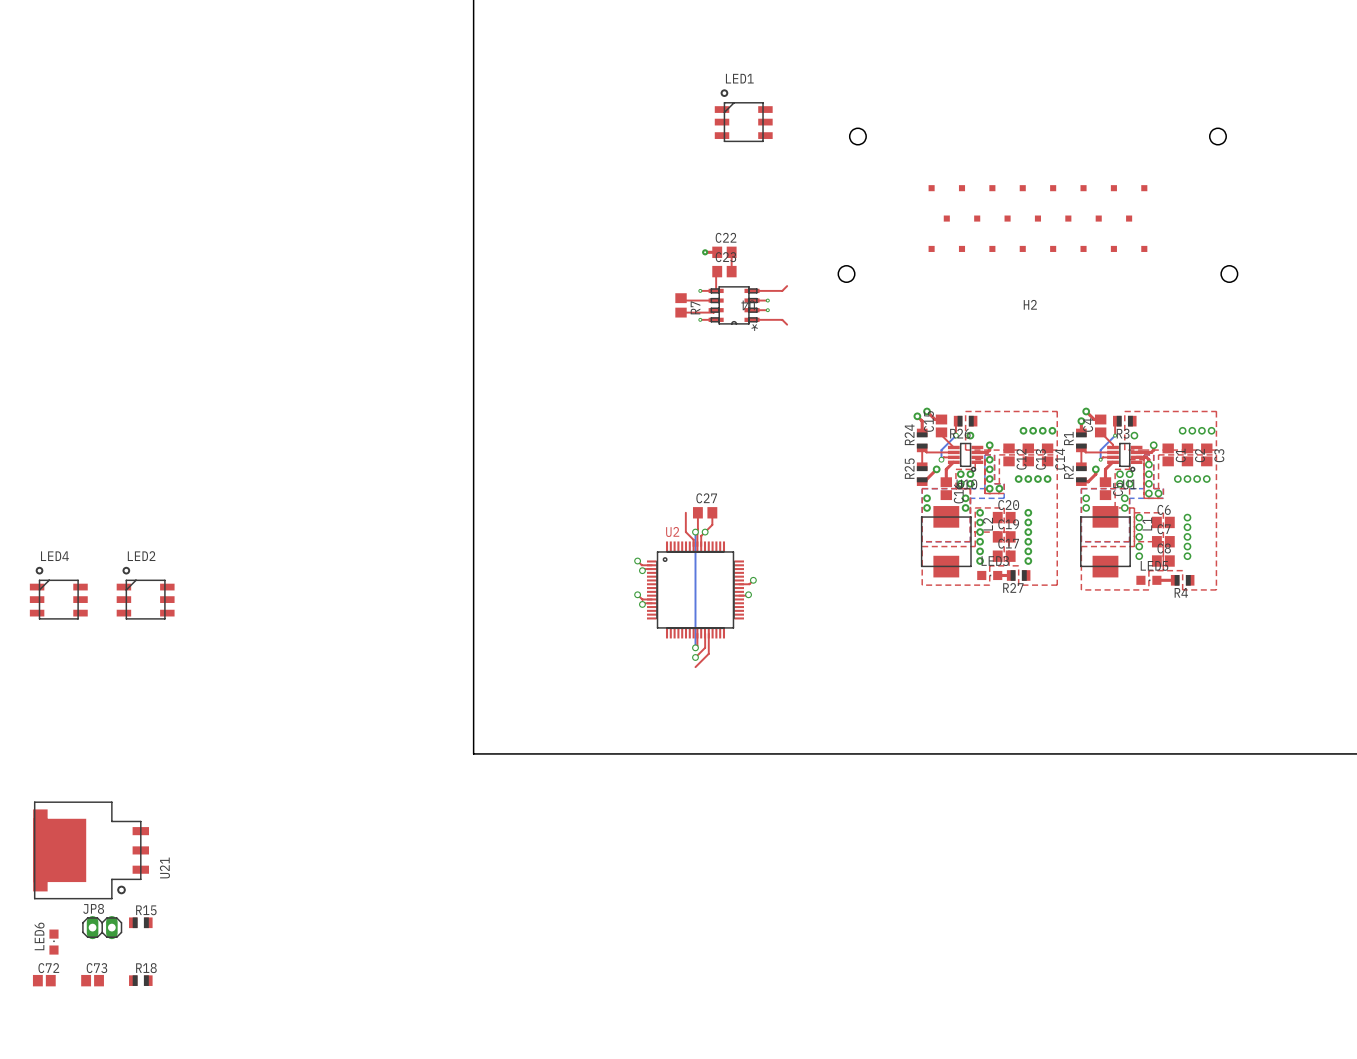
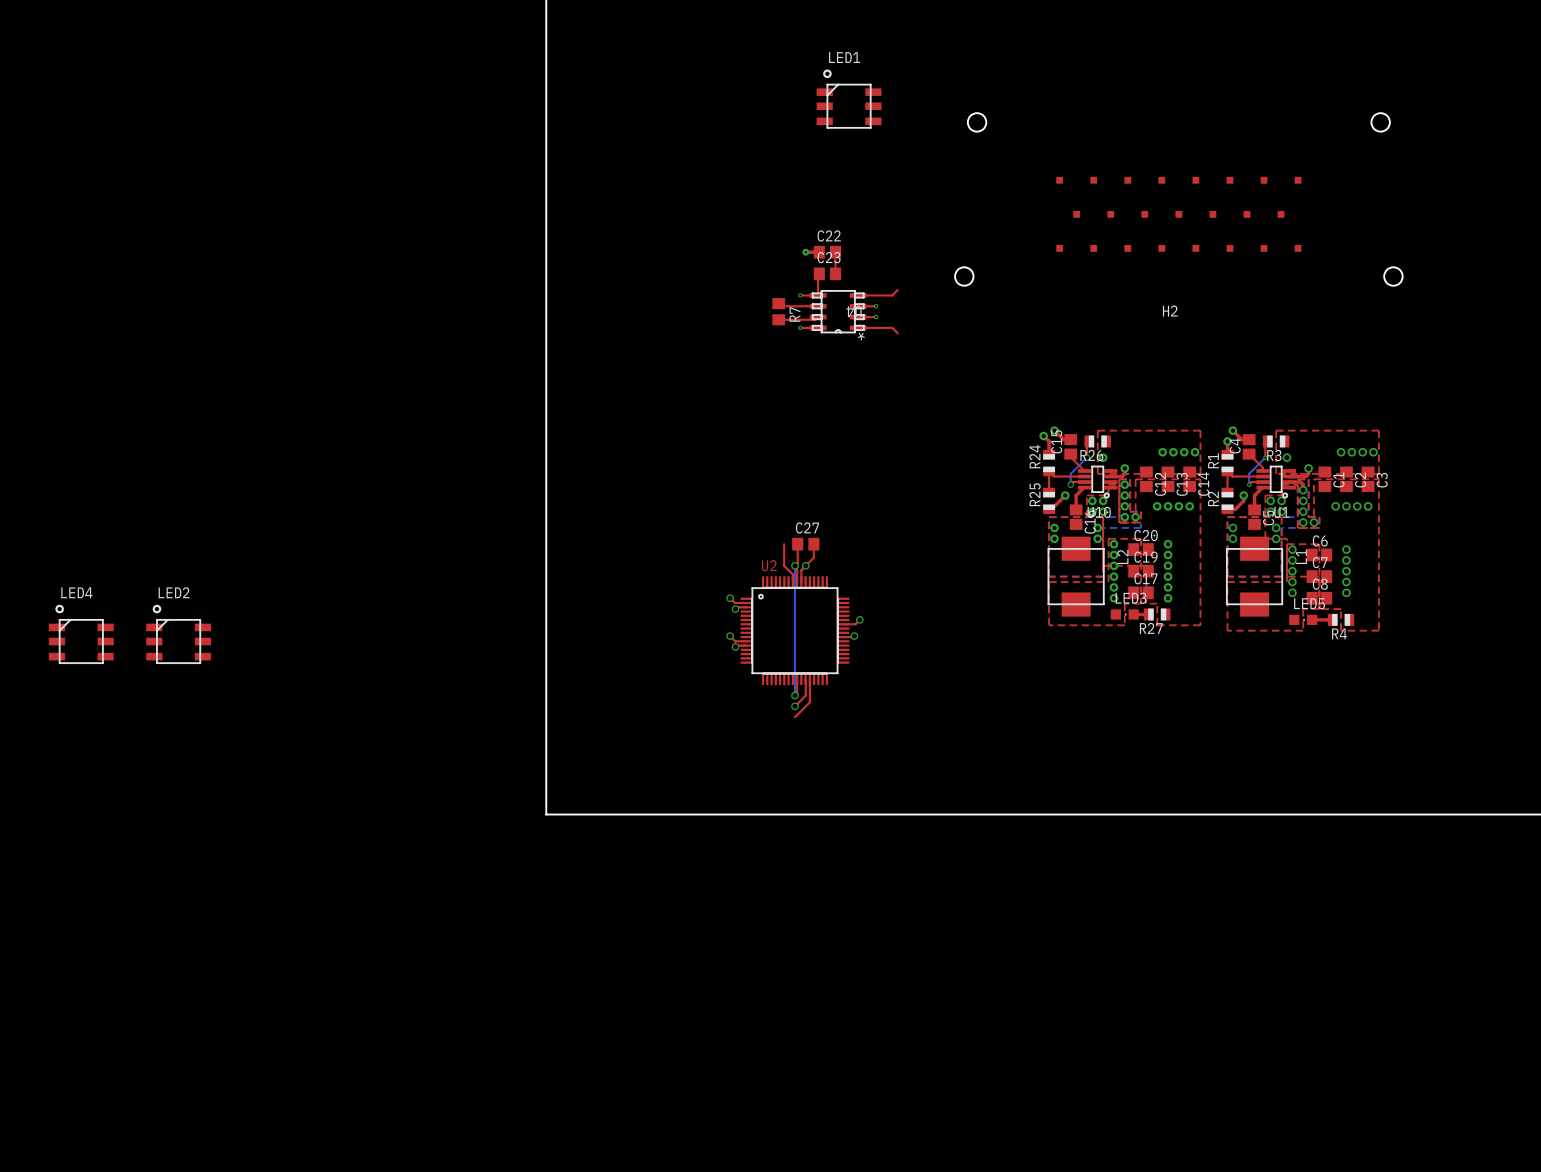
U21: (91, 850) -> none
R15: (140, 922) -> none
JP8: (102, 927) -> none
LED6: (53, 942) -> none
C72: (44, 980) -> none
C73: (92, 980) -> none
R18: (140, 980) -> none

